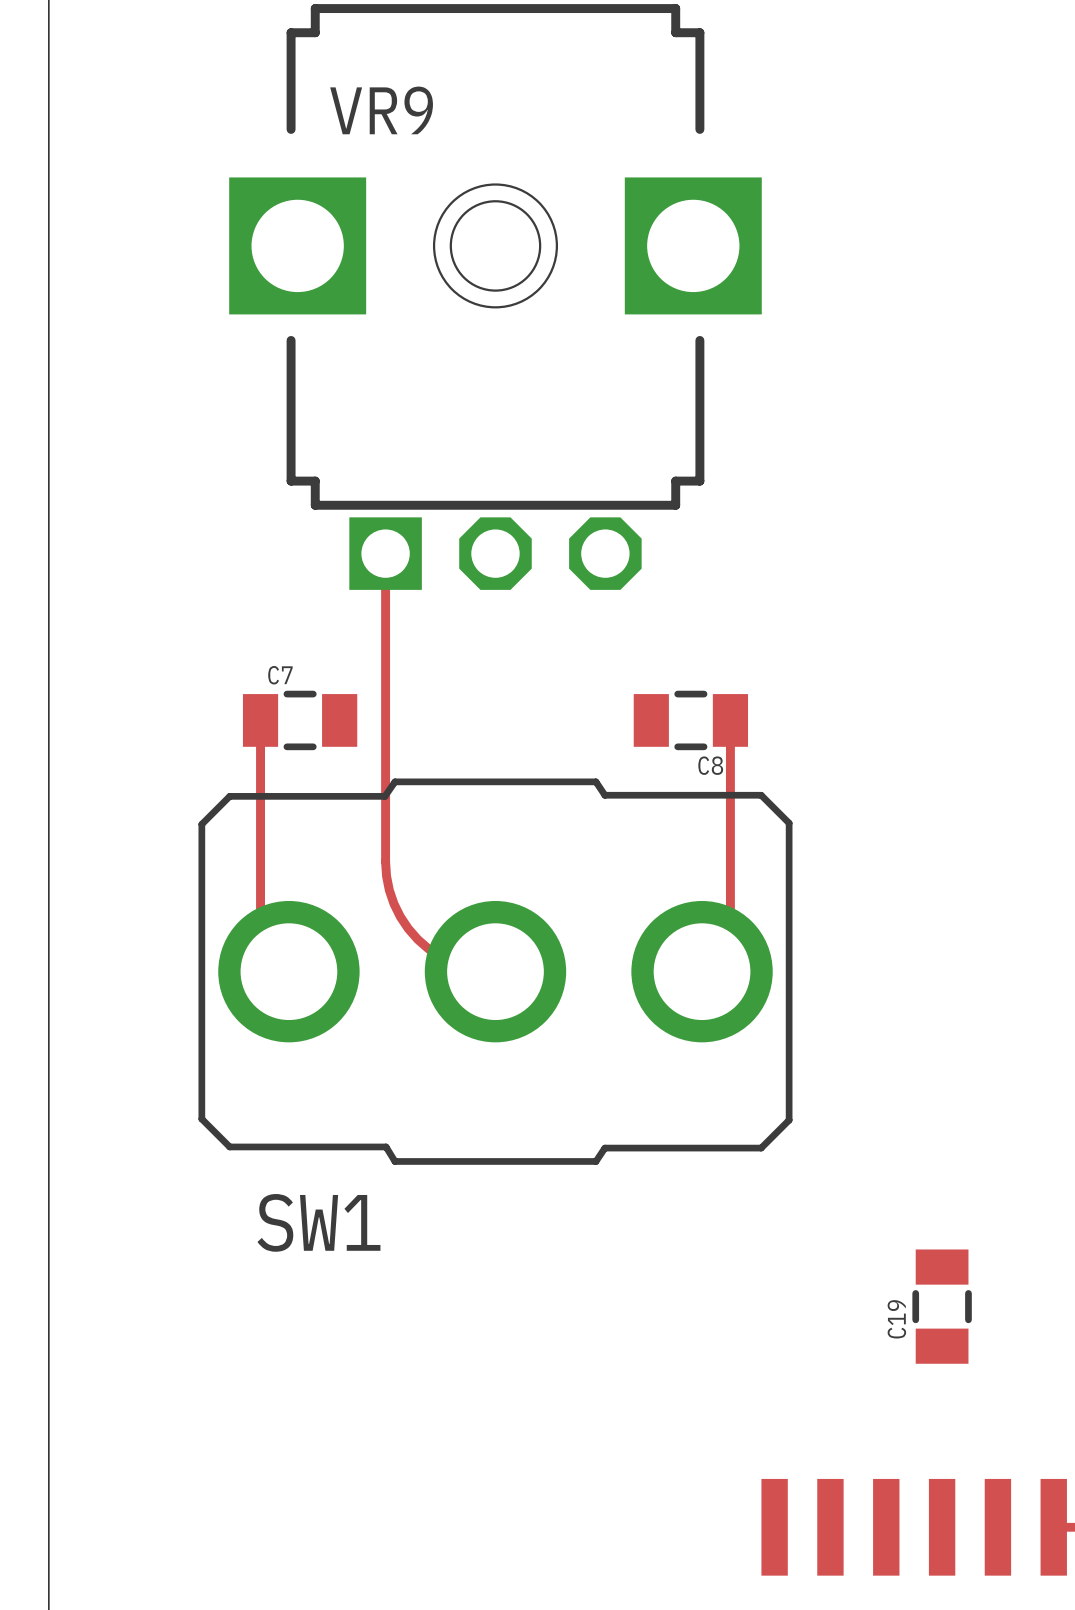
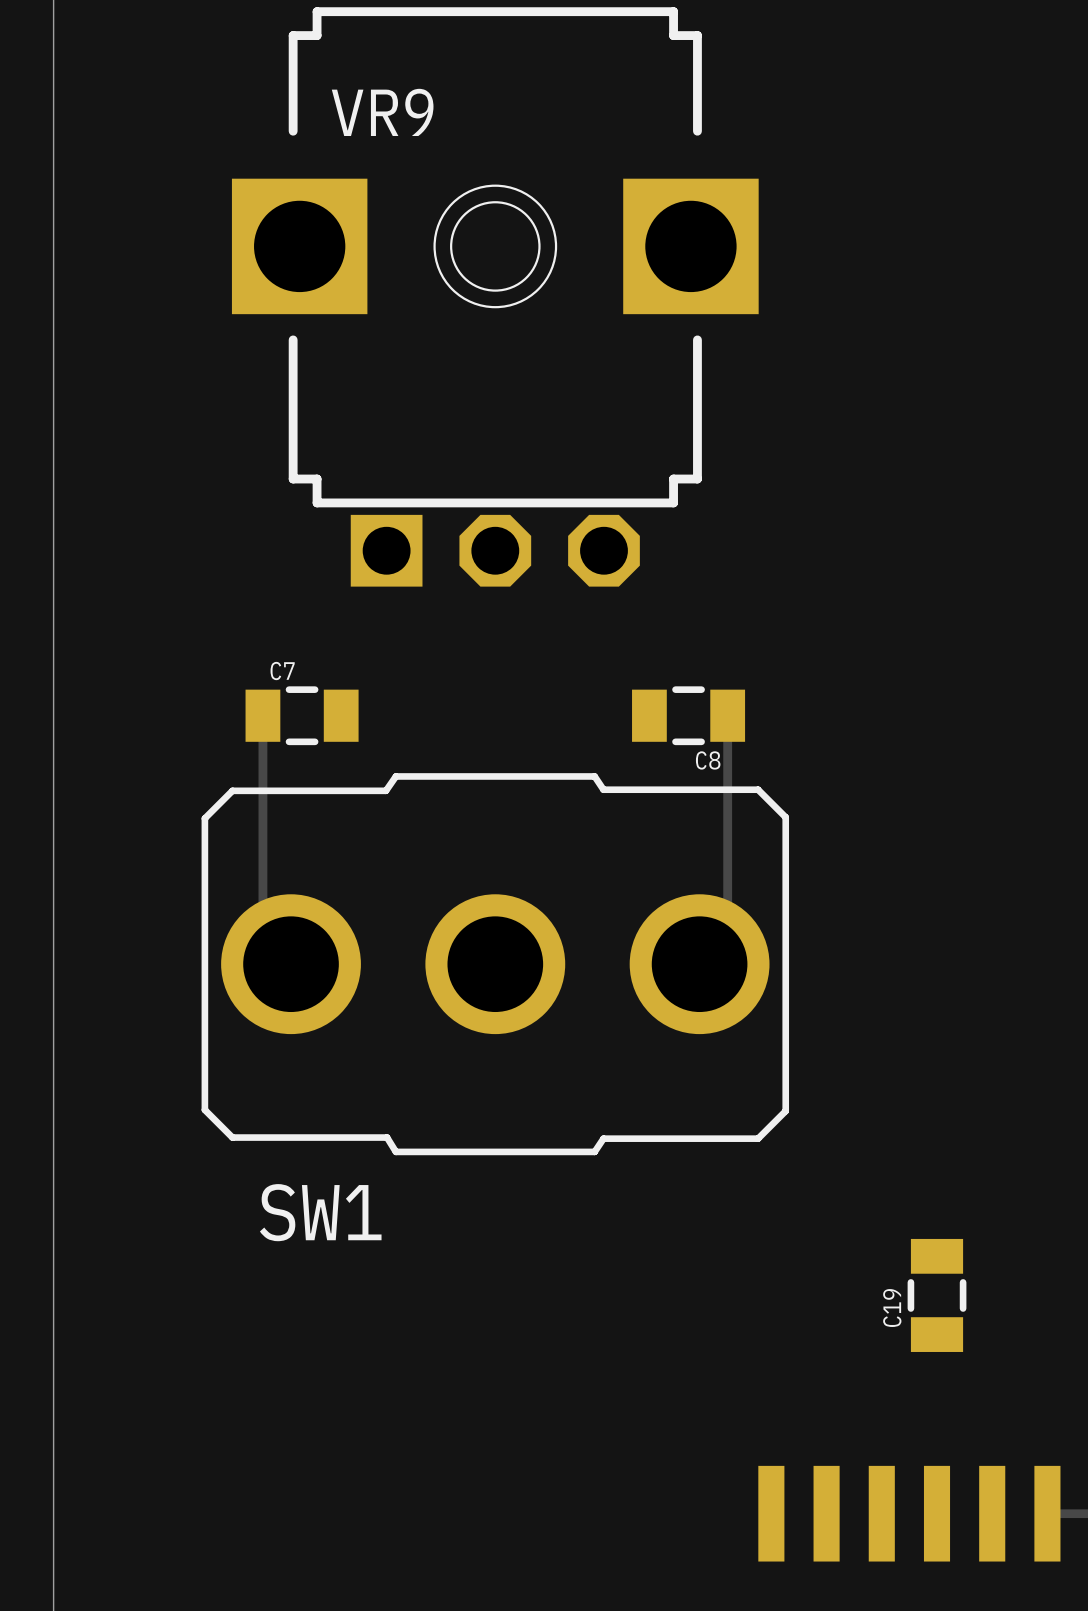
track: (385, 553) (385, 861) (389, 890) (400, 916) (417, 939) (428, 948) (453, 963) (467, 967) (495, 971) -> none

